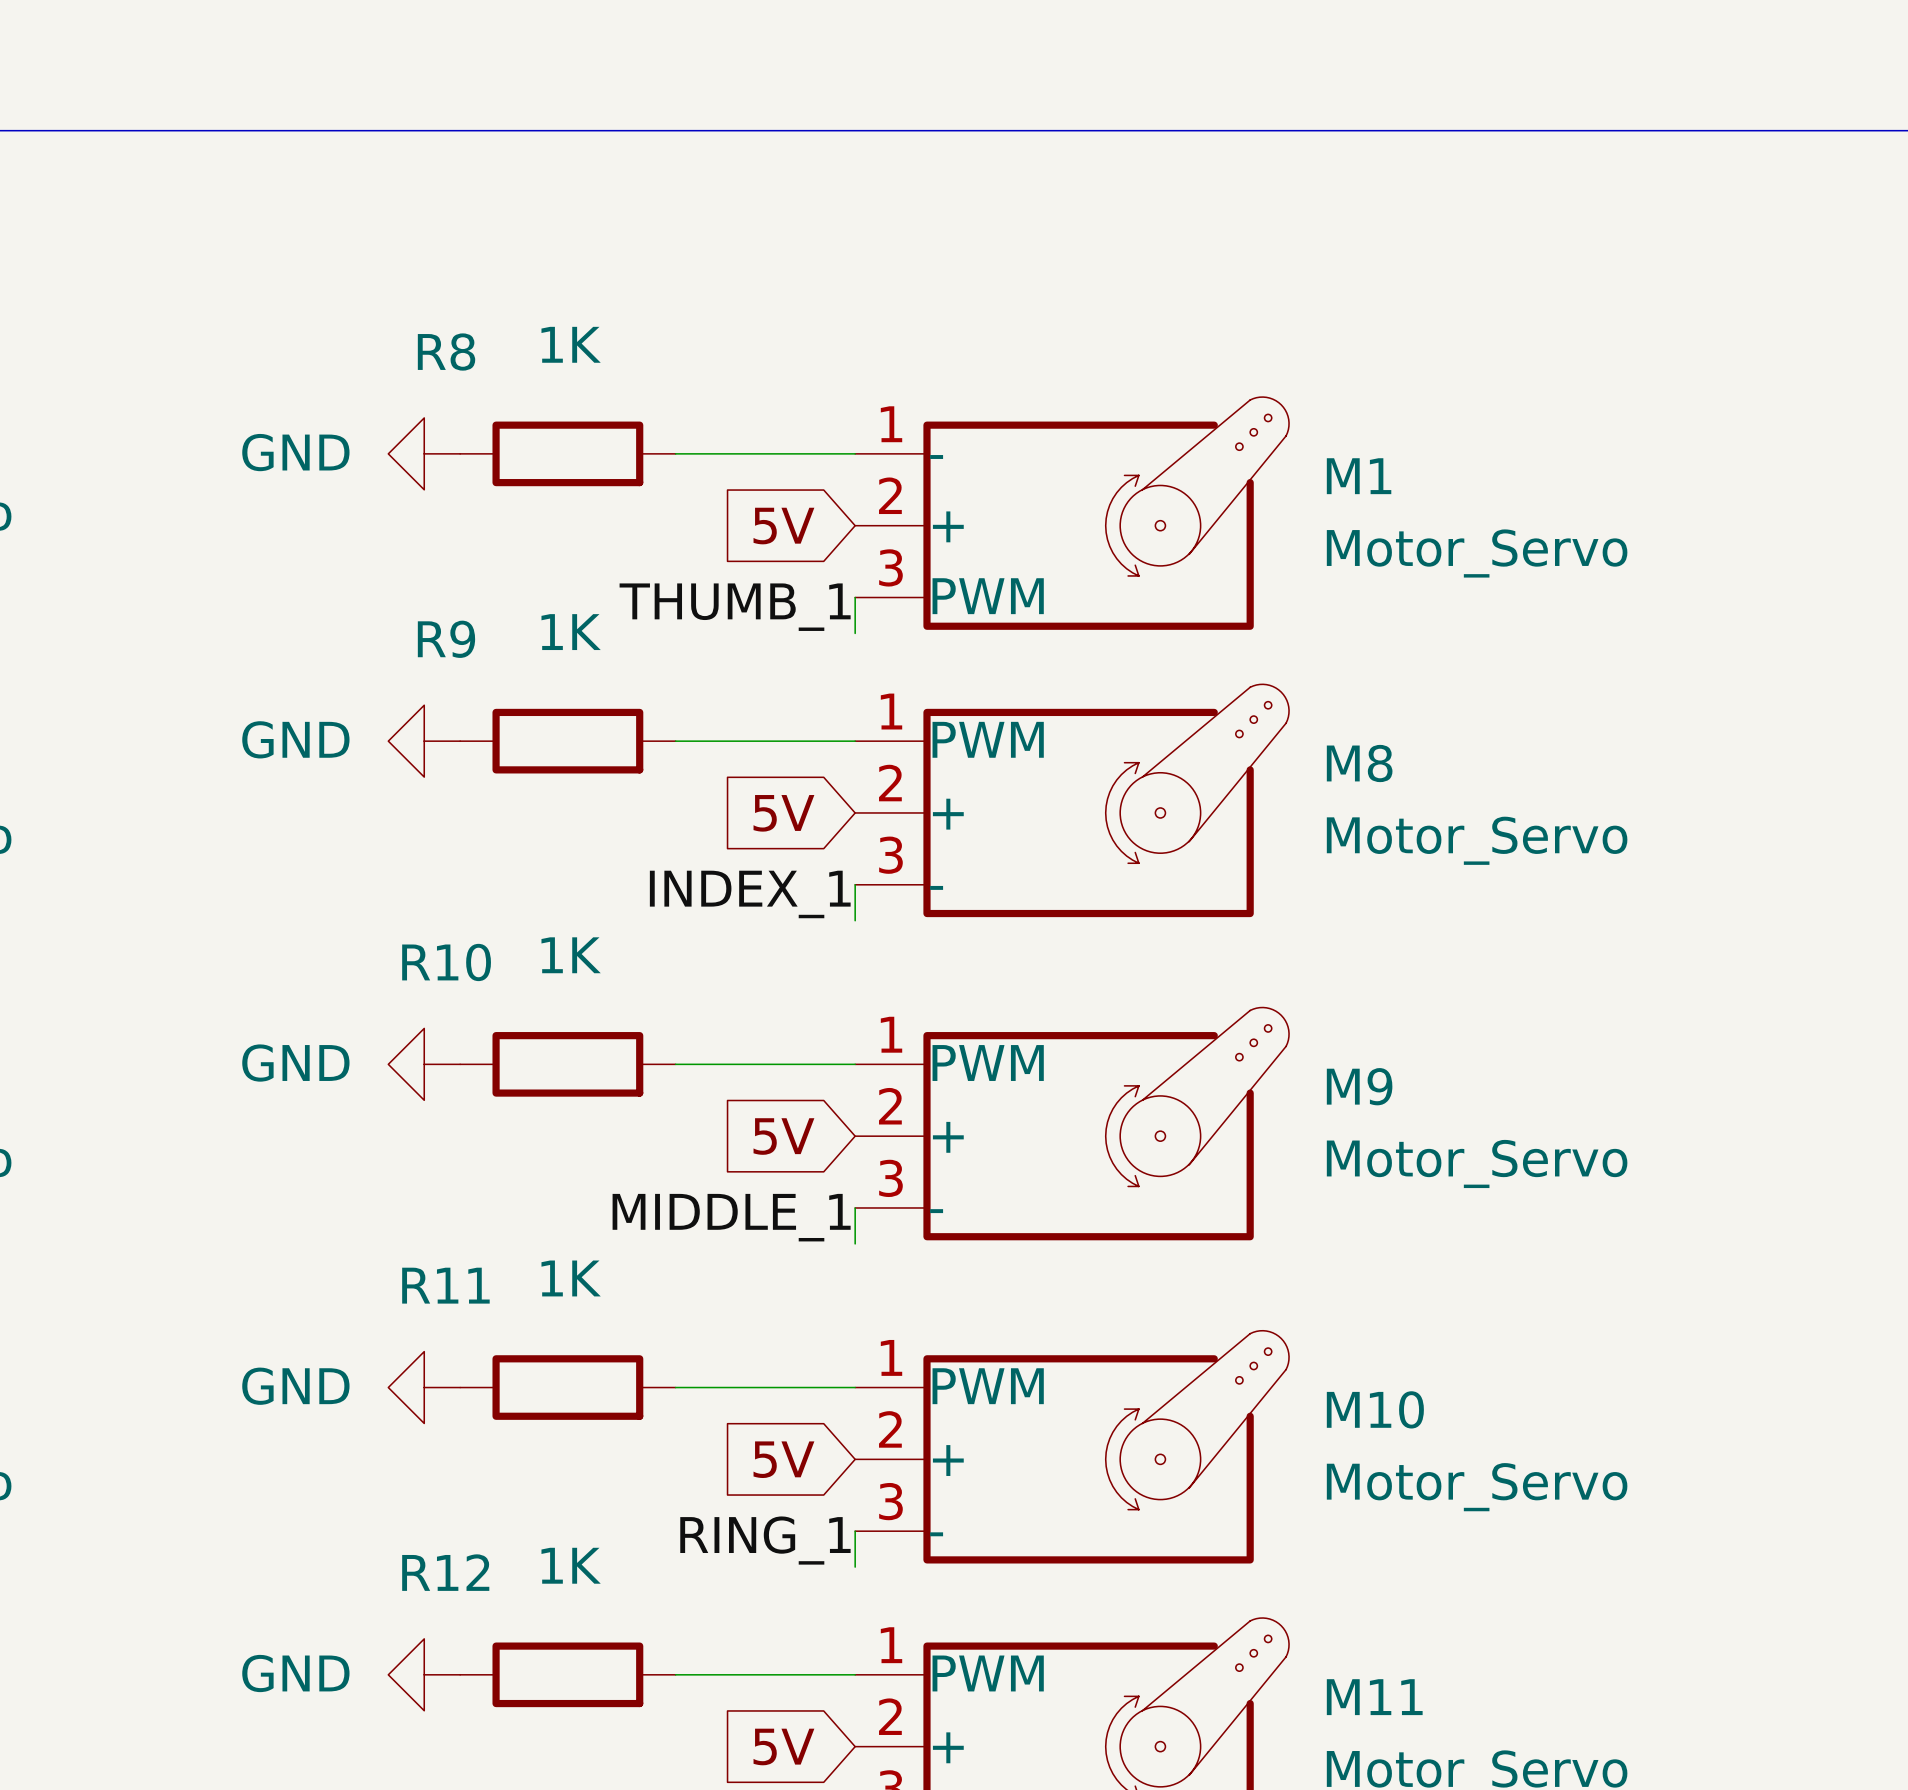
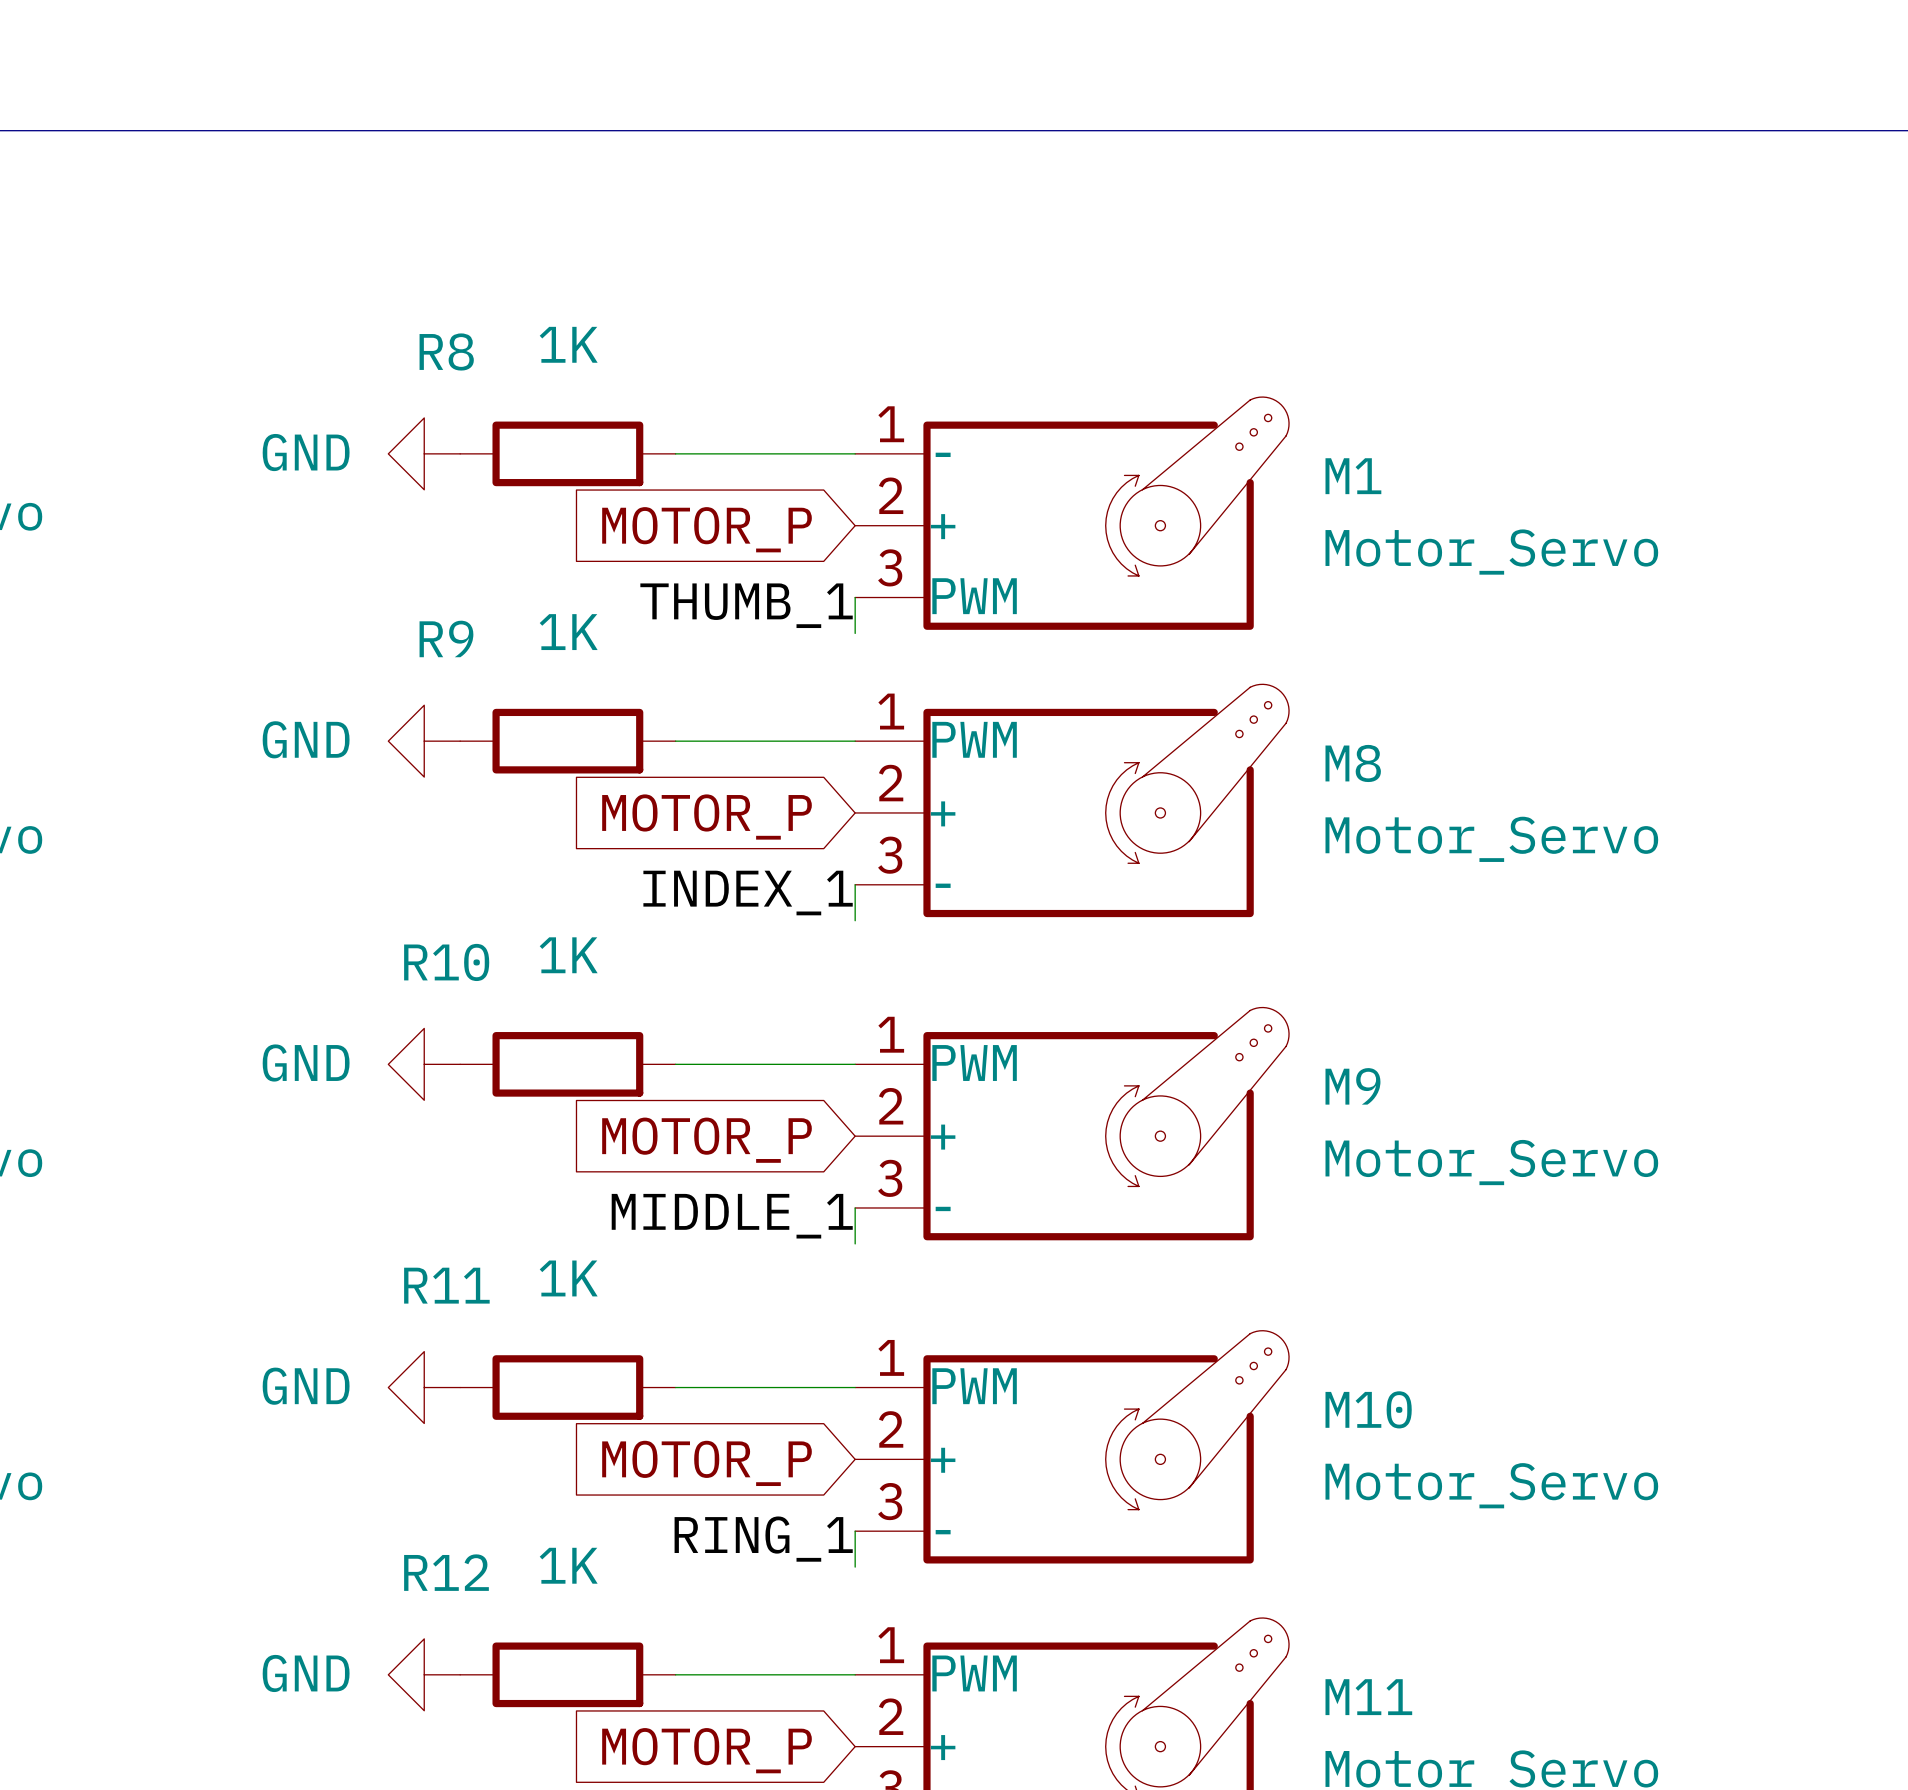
global label: 5V (783, 526) -> MOTOR_P (707, 529)
global label: 5V (783, 813) -> MOTOR_P (707, 817)
global label: 5V (783, 1136) -> MOTOR_P (707, 1140)
global label: 5V (783, 1459) -> MOTOR_P (707, 1463)
global label: 5V (783, 1746) -> MOTOR_P (707, 1750)

